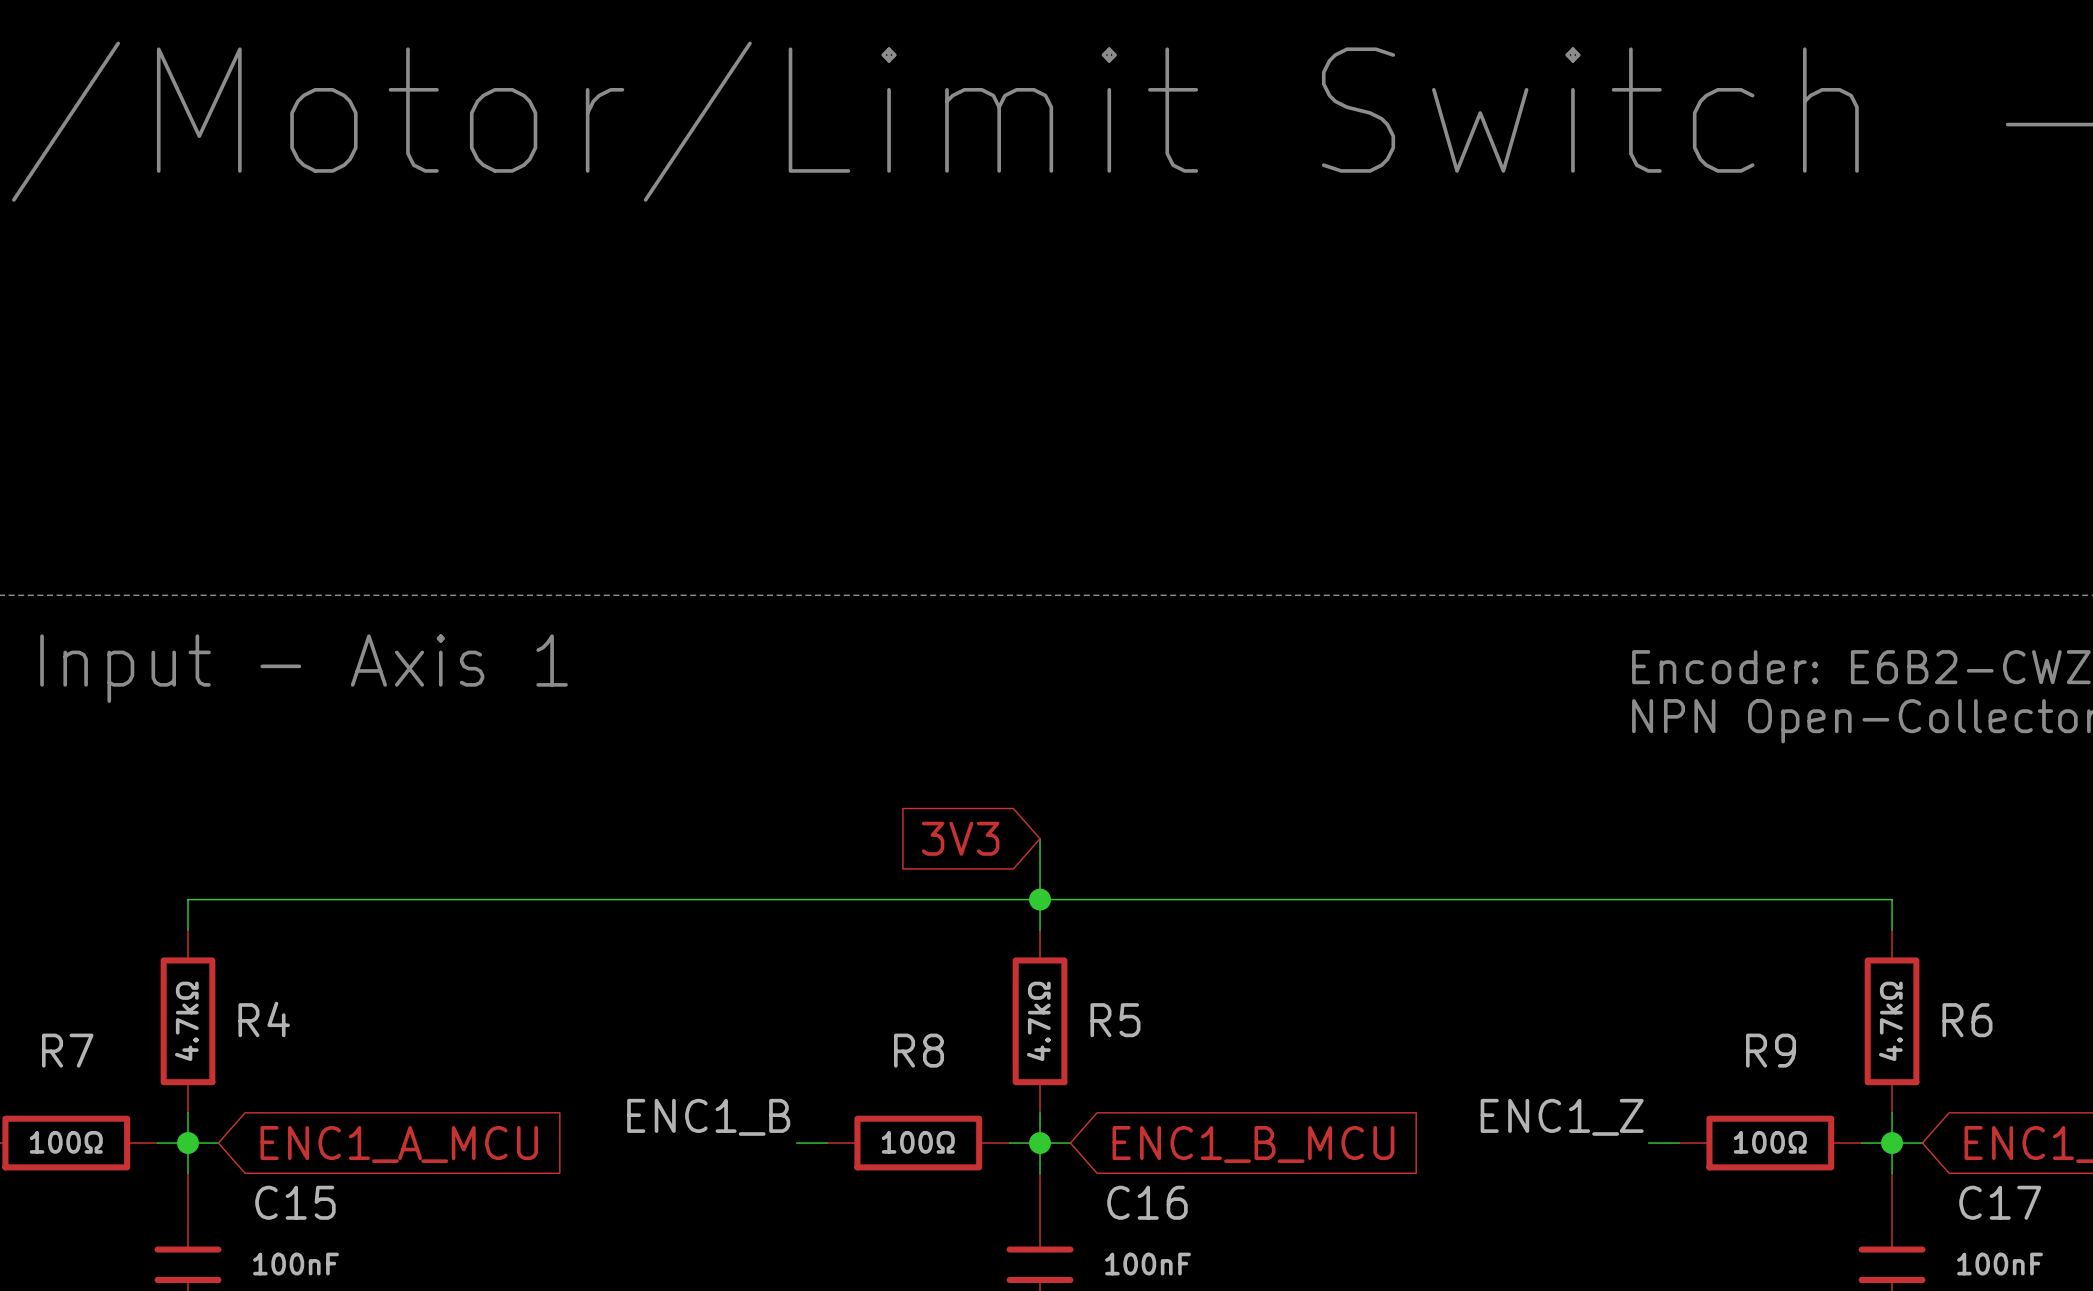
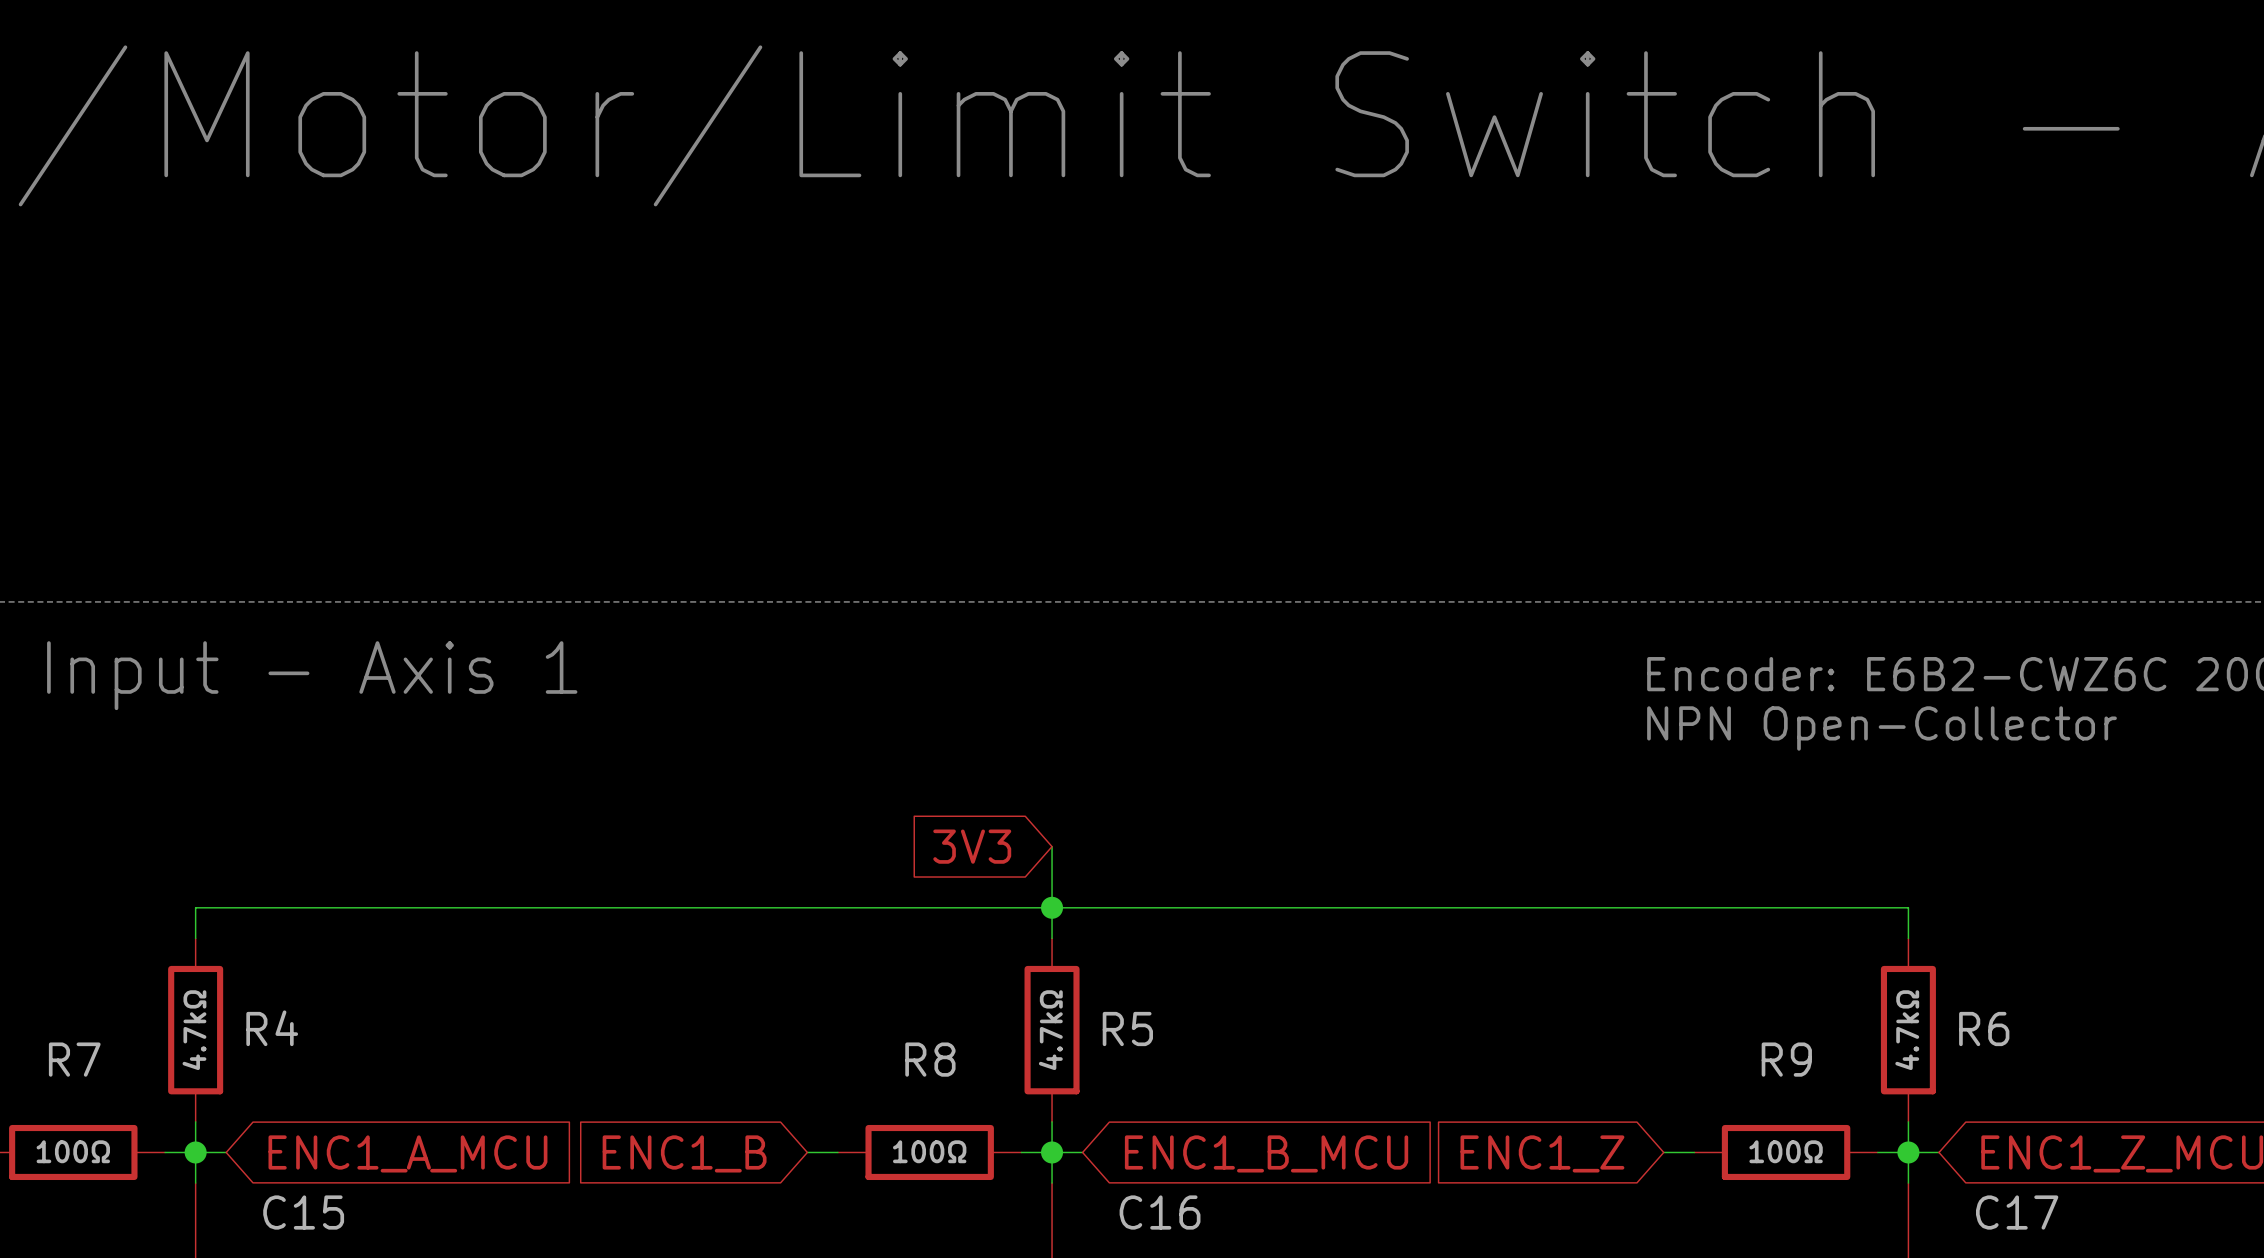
label: ENC1_B (708, 1117) -> none
label: ENC1_Z (1562, 1117) -> none
global label: none -> ENC1_B (684, 1153)
global label: none -> ENC1_Z (1542, 1153)

